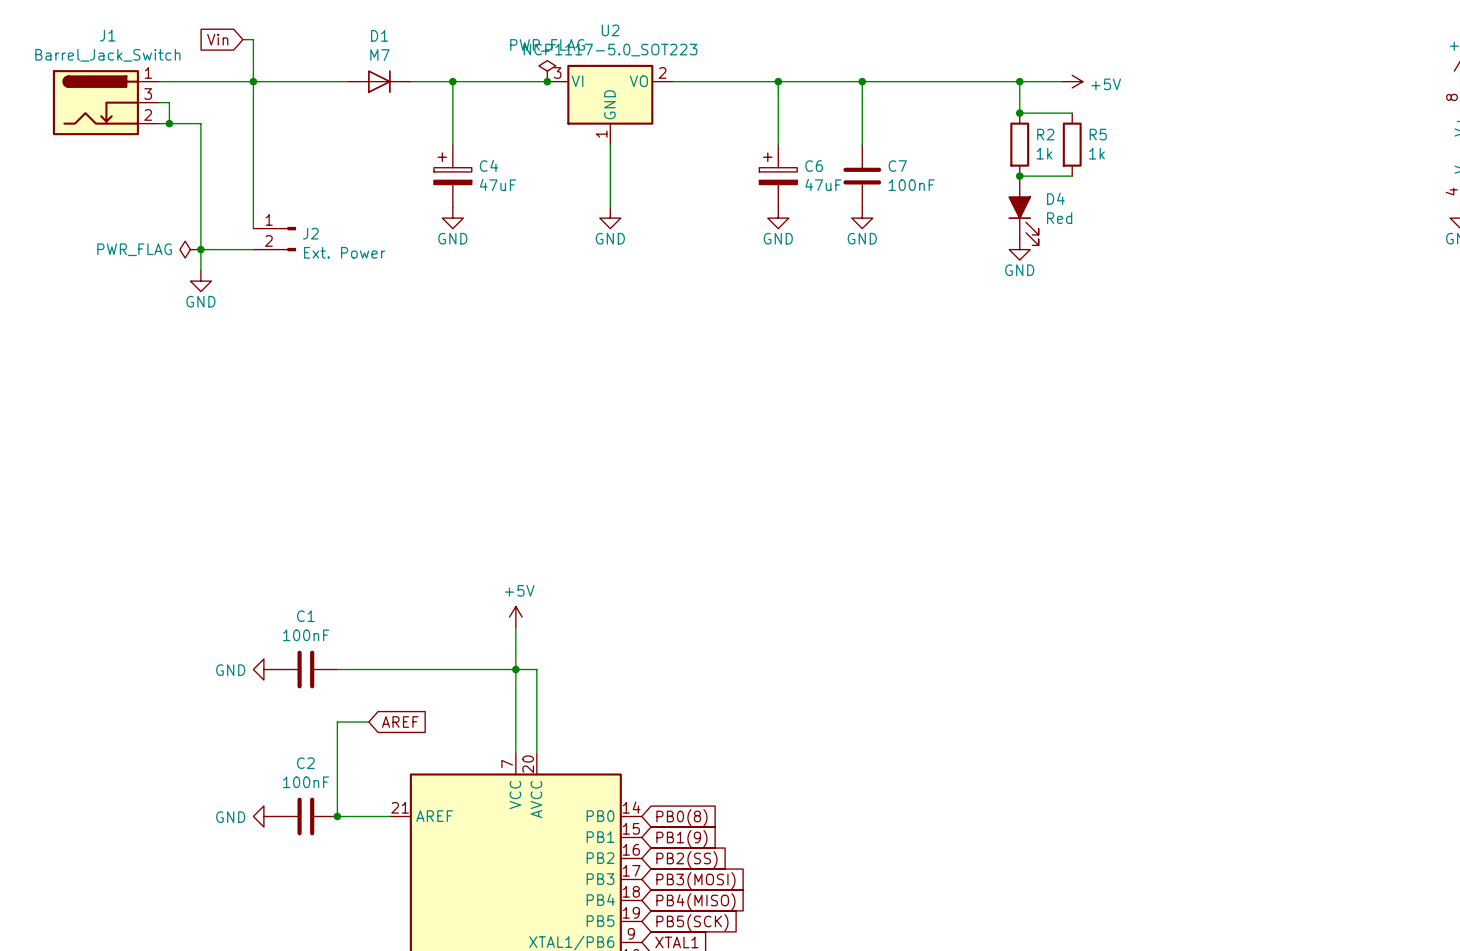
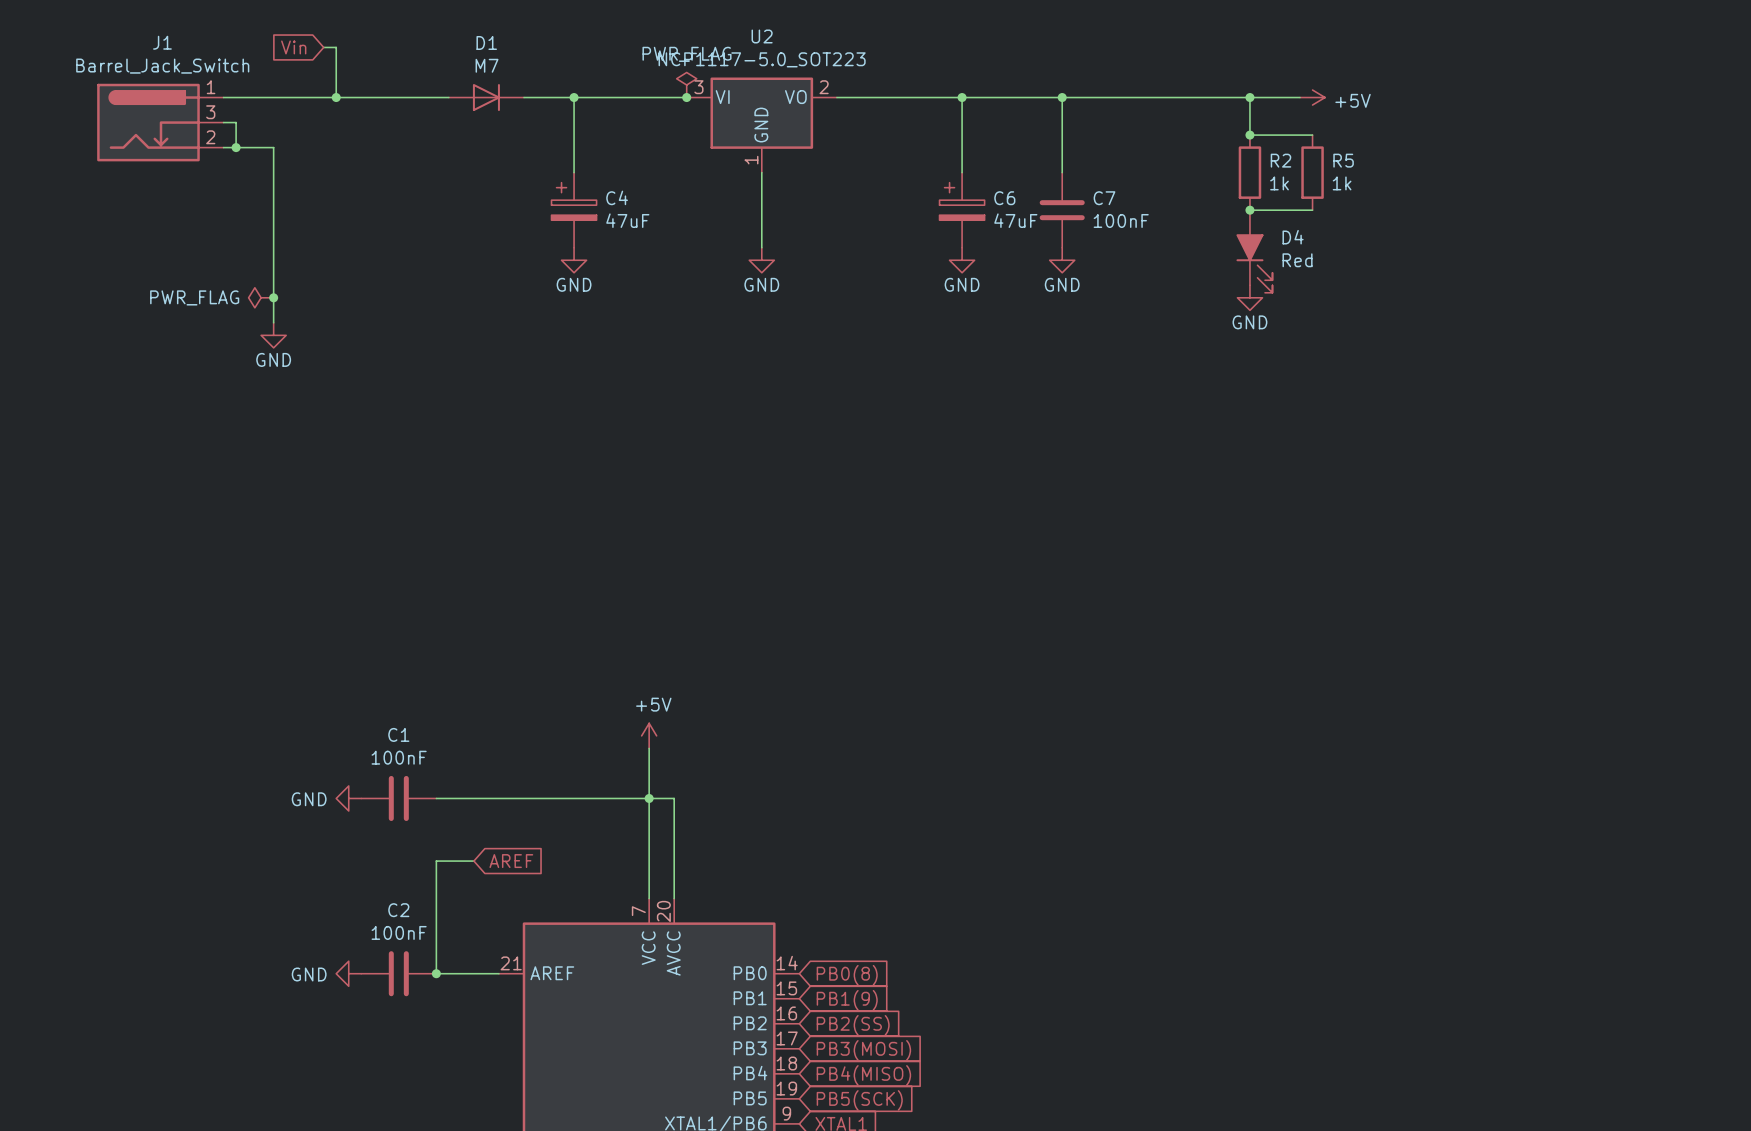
wire: (253, 81) (253, 228) -> none
J2: Ext. Power (274, 239) -> none
wire: (200, 249) (253, 249) -> none

